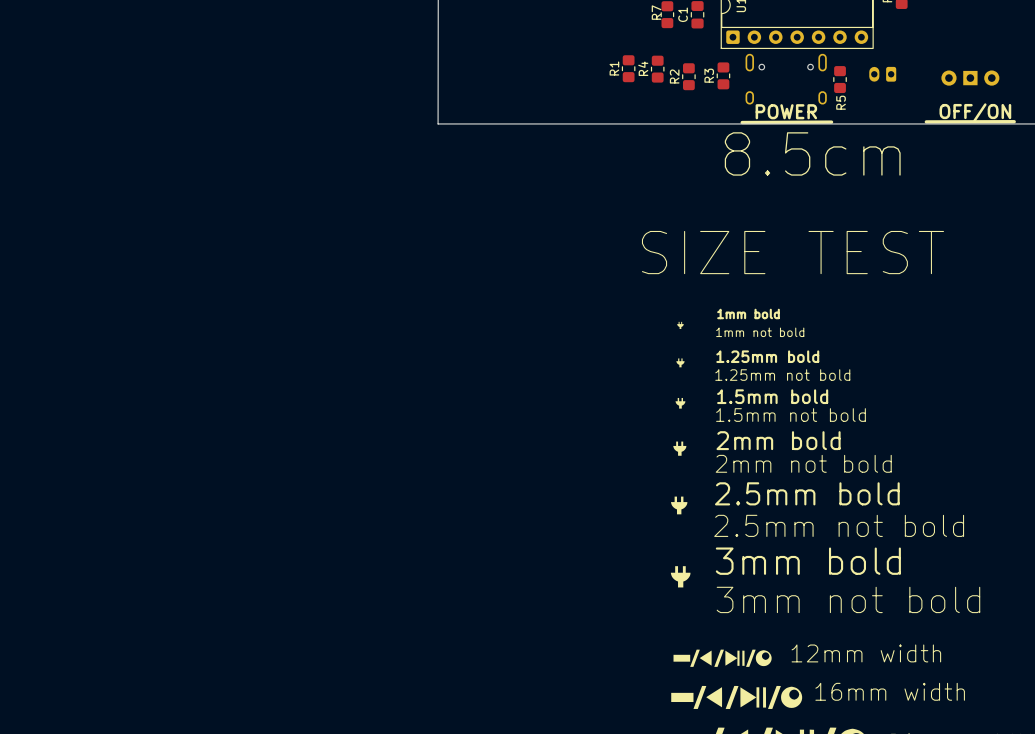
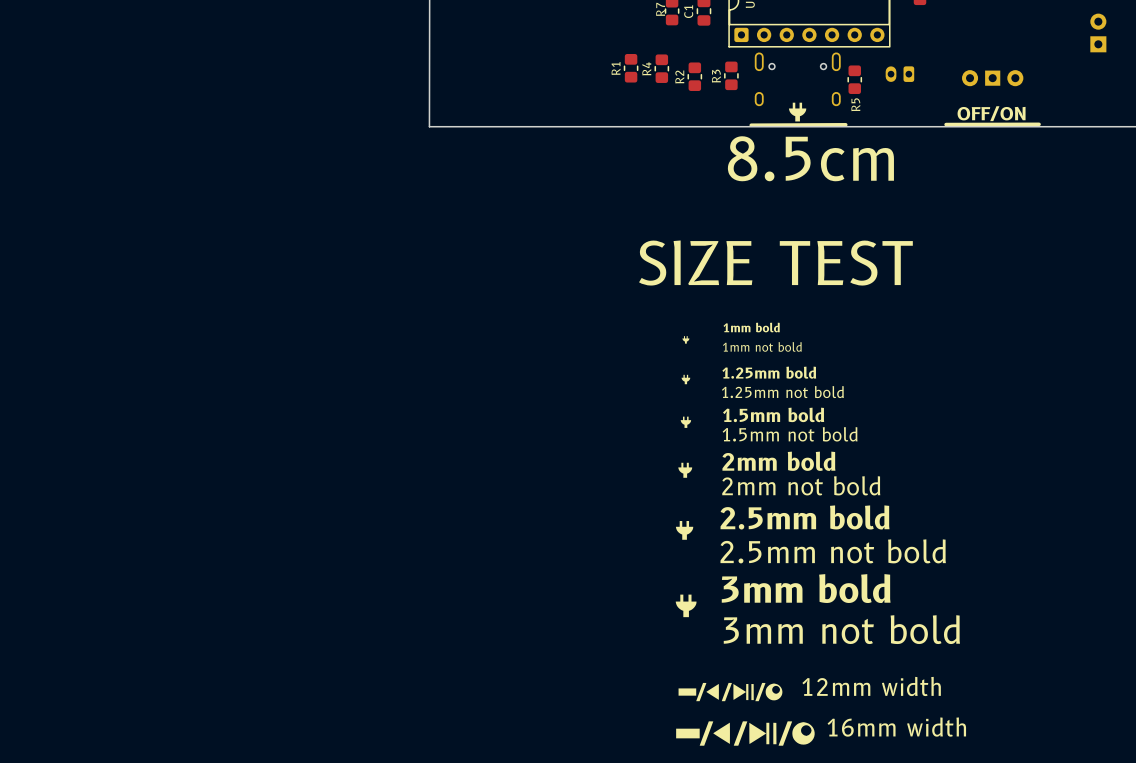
drawing: none -> [788, 102, 807, 122]
text: POWER (786, 111) -> none

